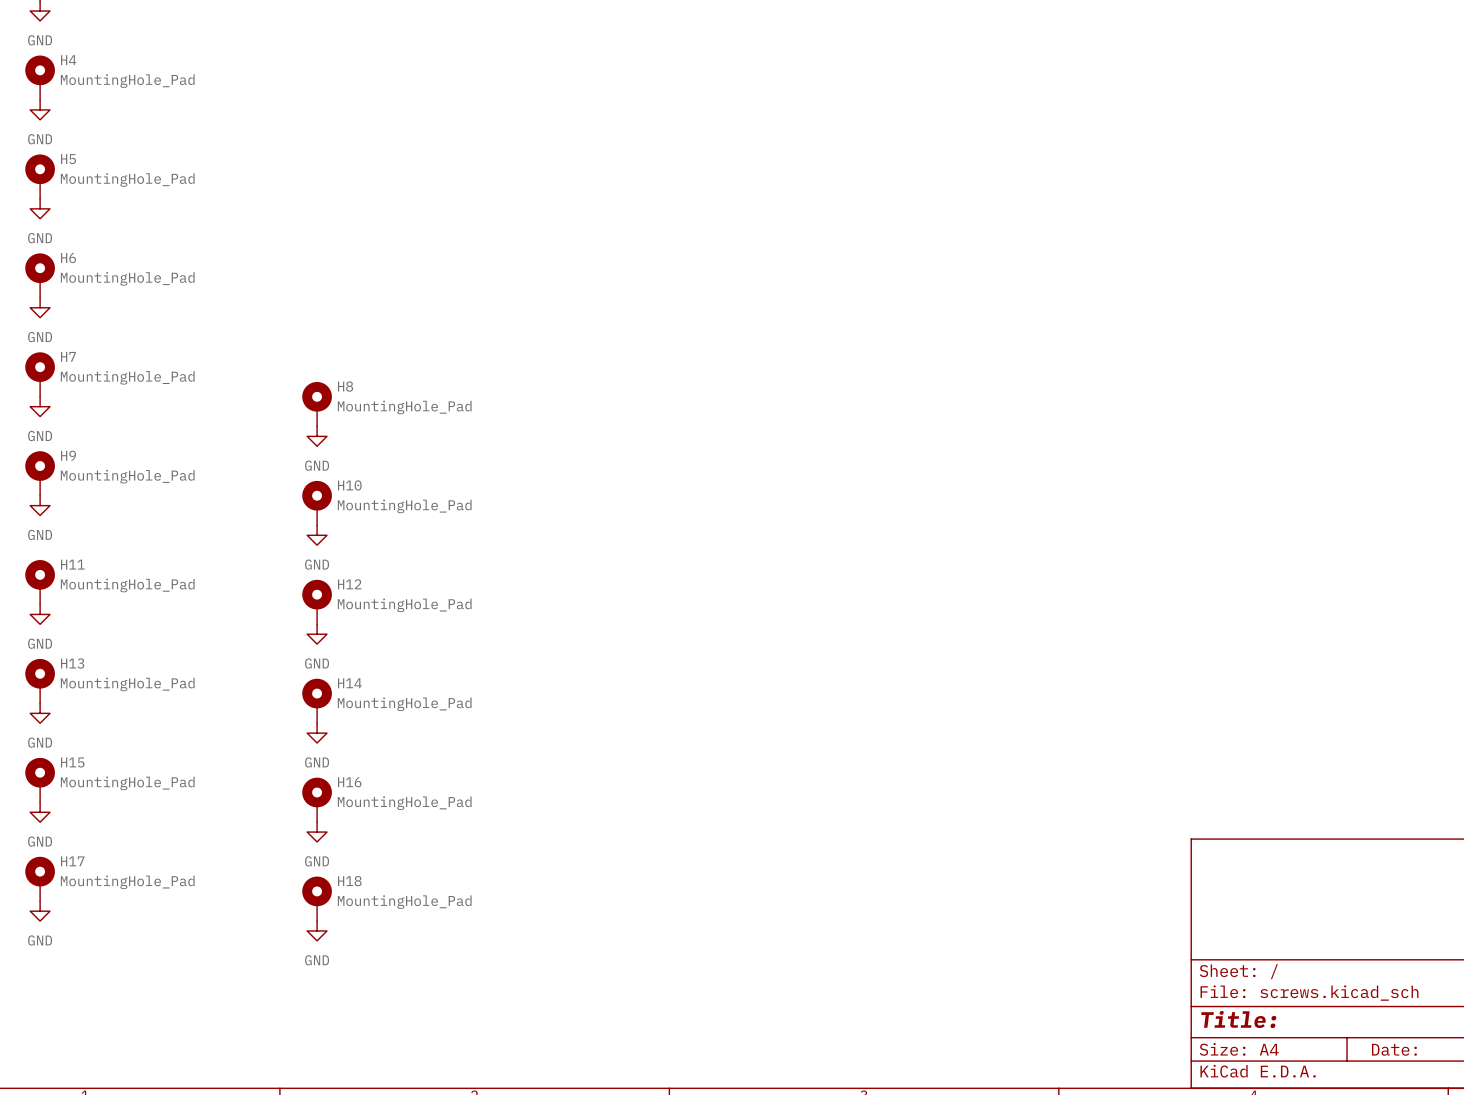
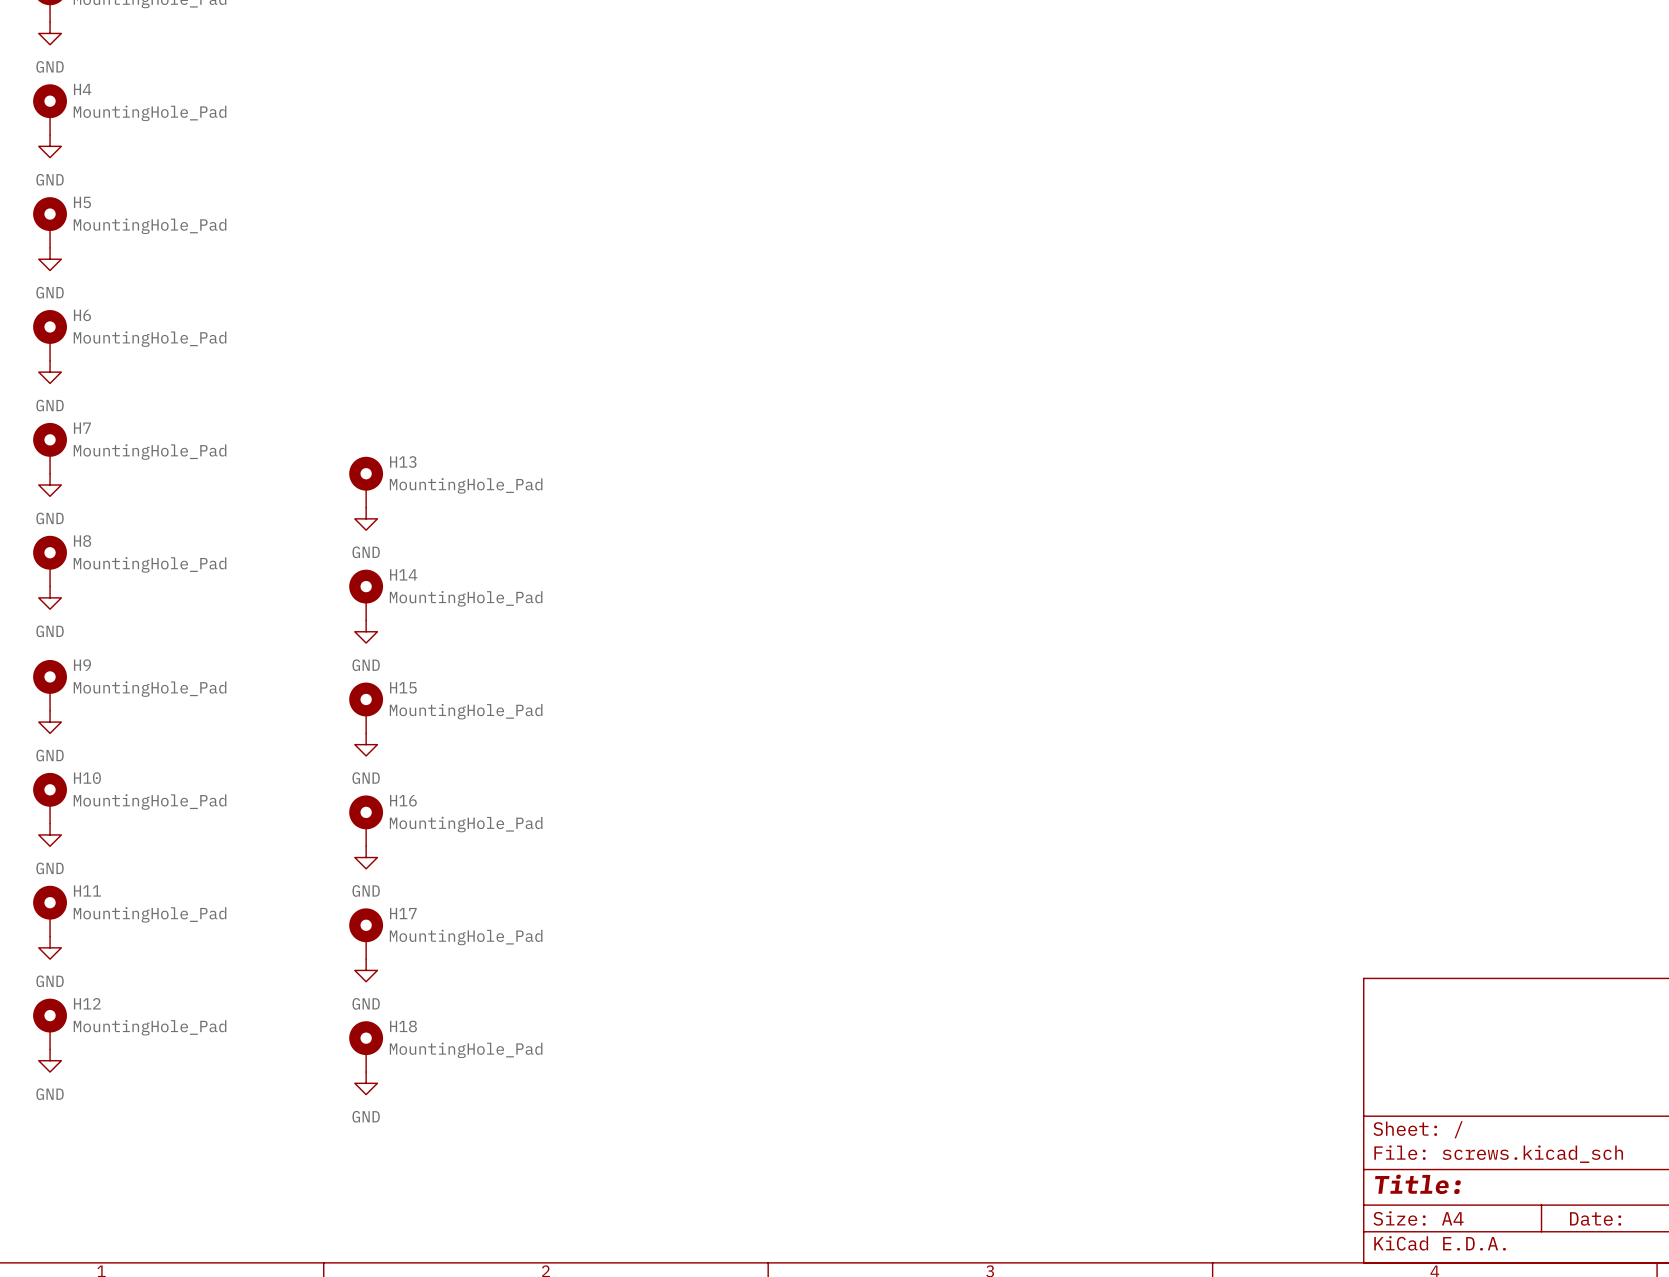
H8 name: H8 (345, 386) -> H13 (403, 462)
H9 name: H9 (68, 455) -> H8 (82, 541)
H10 name: H10 (349, 485) -> H14 (403, 574)
H11 name: H11 (72, 564) -> H9 (82, 665)
H12 name: H12 (349, 584) -> H15 (403, 687)
H13 name: H13 (72, 663) -> H10 (87, 778)
H14 name: H14 (349, 683) -> H16 (403, 800)
H15 name: H15 (72, 762) -> H11 (87, 890)
H16 name: H16 (349, 782) -> H17 (403, 913)
H17 name: H17 (72, 861) -> H12 (87, 1003)

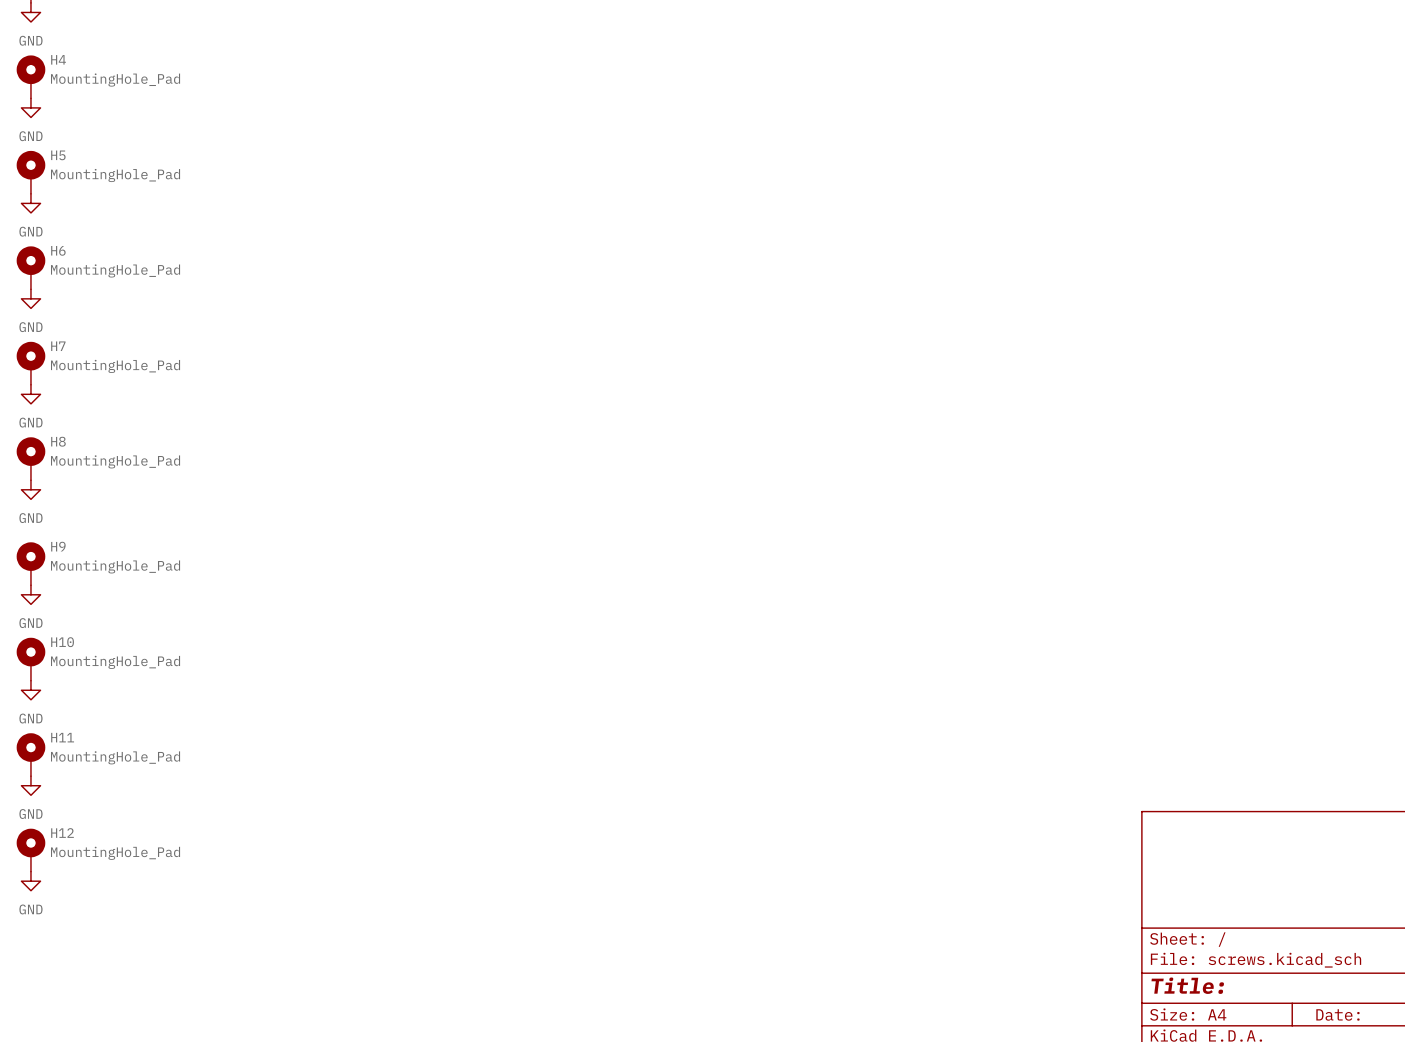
H13: MountingHole_Pad (366, 482) -> none
power symbol: GND (366, 518) -> none
H14: MountingHole_Pad (366, 595) -> none
power symbol: GND (366, 631) -> none
H15: MountingHole_Pad (366, 707) -> none
power symbol: GND (366, 744) -> none
H16: MountingHole_Pad (366, 820) -> none
power symbol: GND (366, 857) -> none
H17: MountingHole_Pad (366, 933) -> none
power symbol: GND (366, 970) -> none
H18: MountingHole_Pad (366, 1046) -> none
power symbol: GND (366, 1083) -> none

